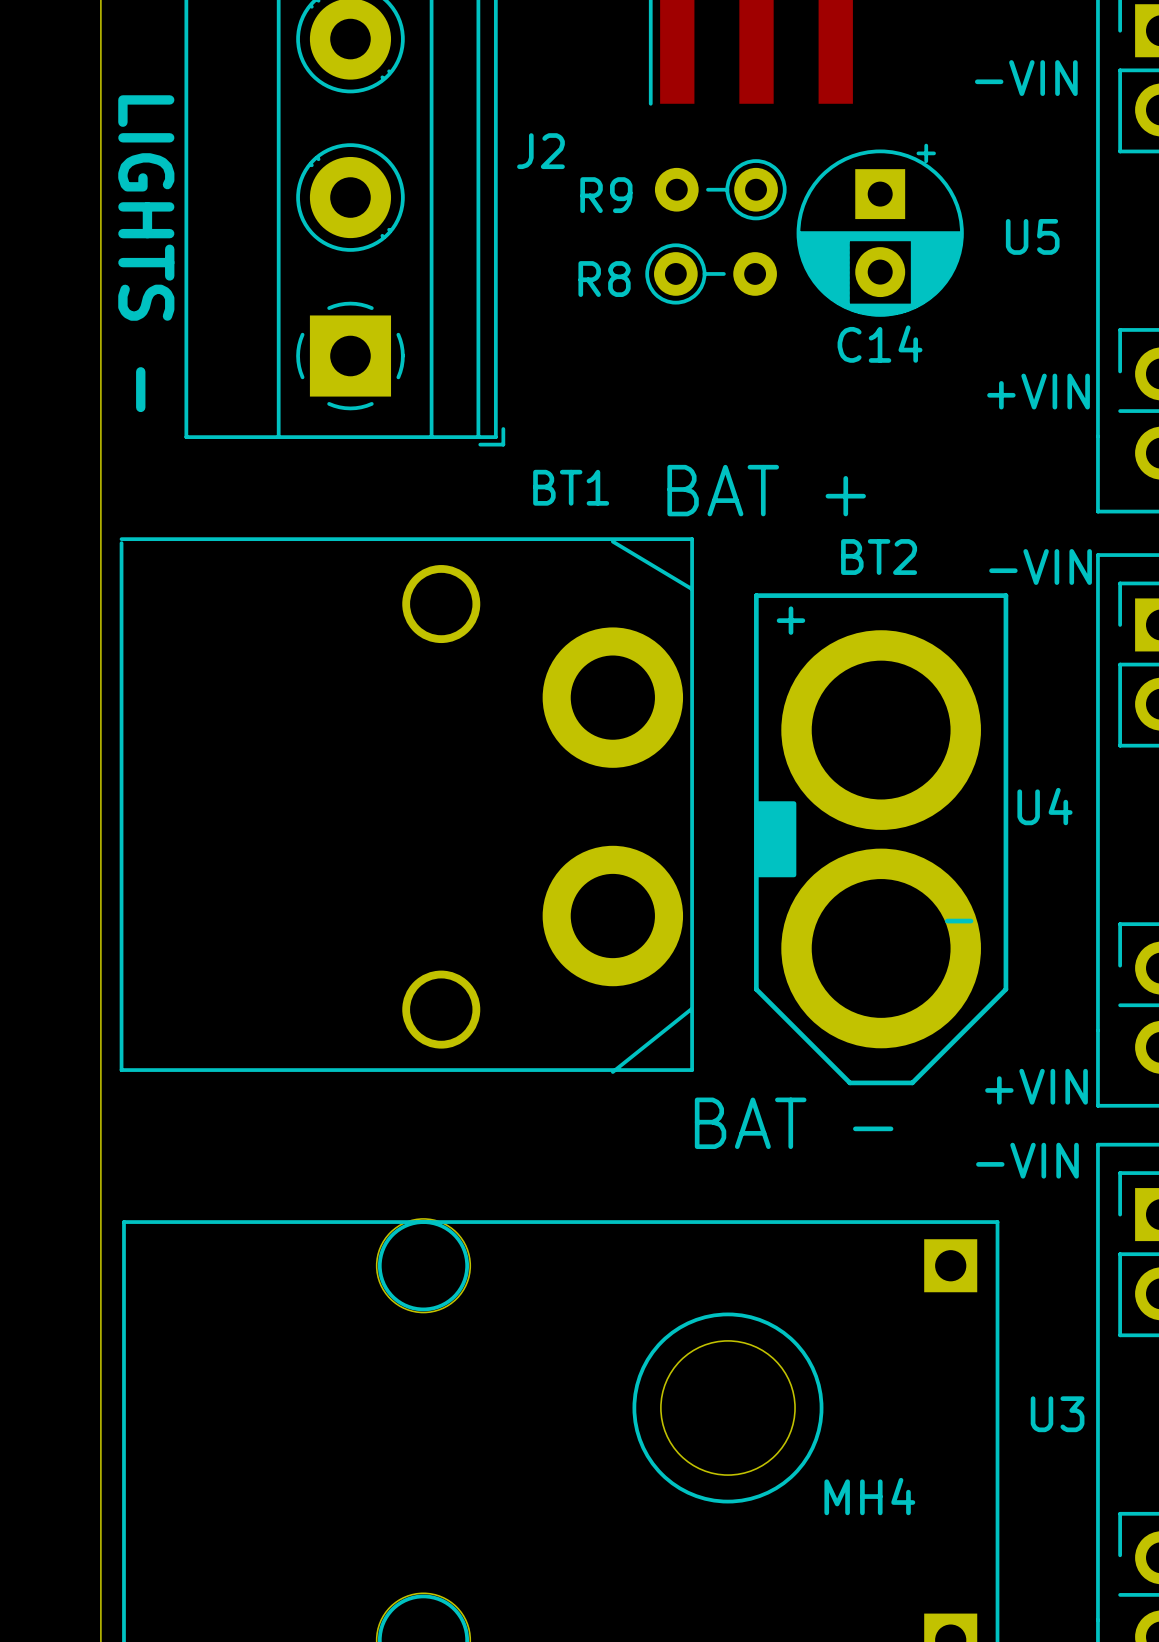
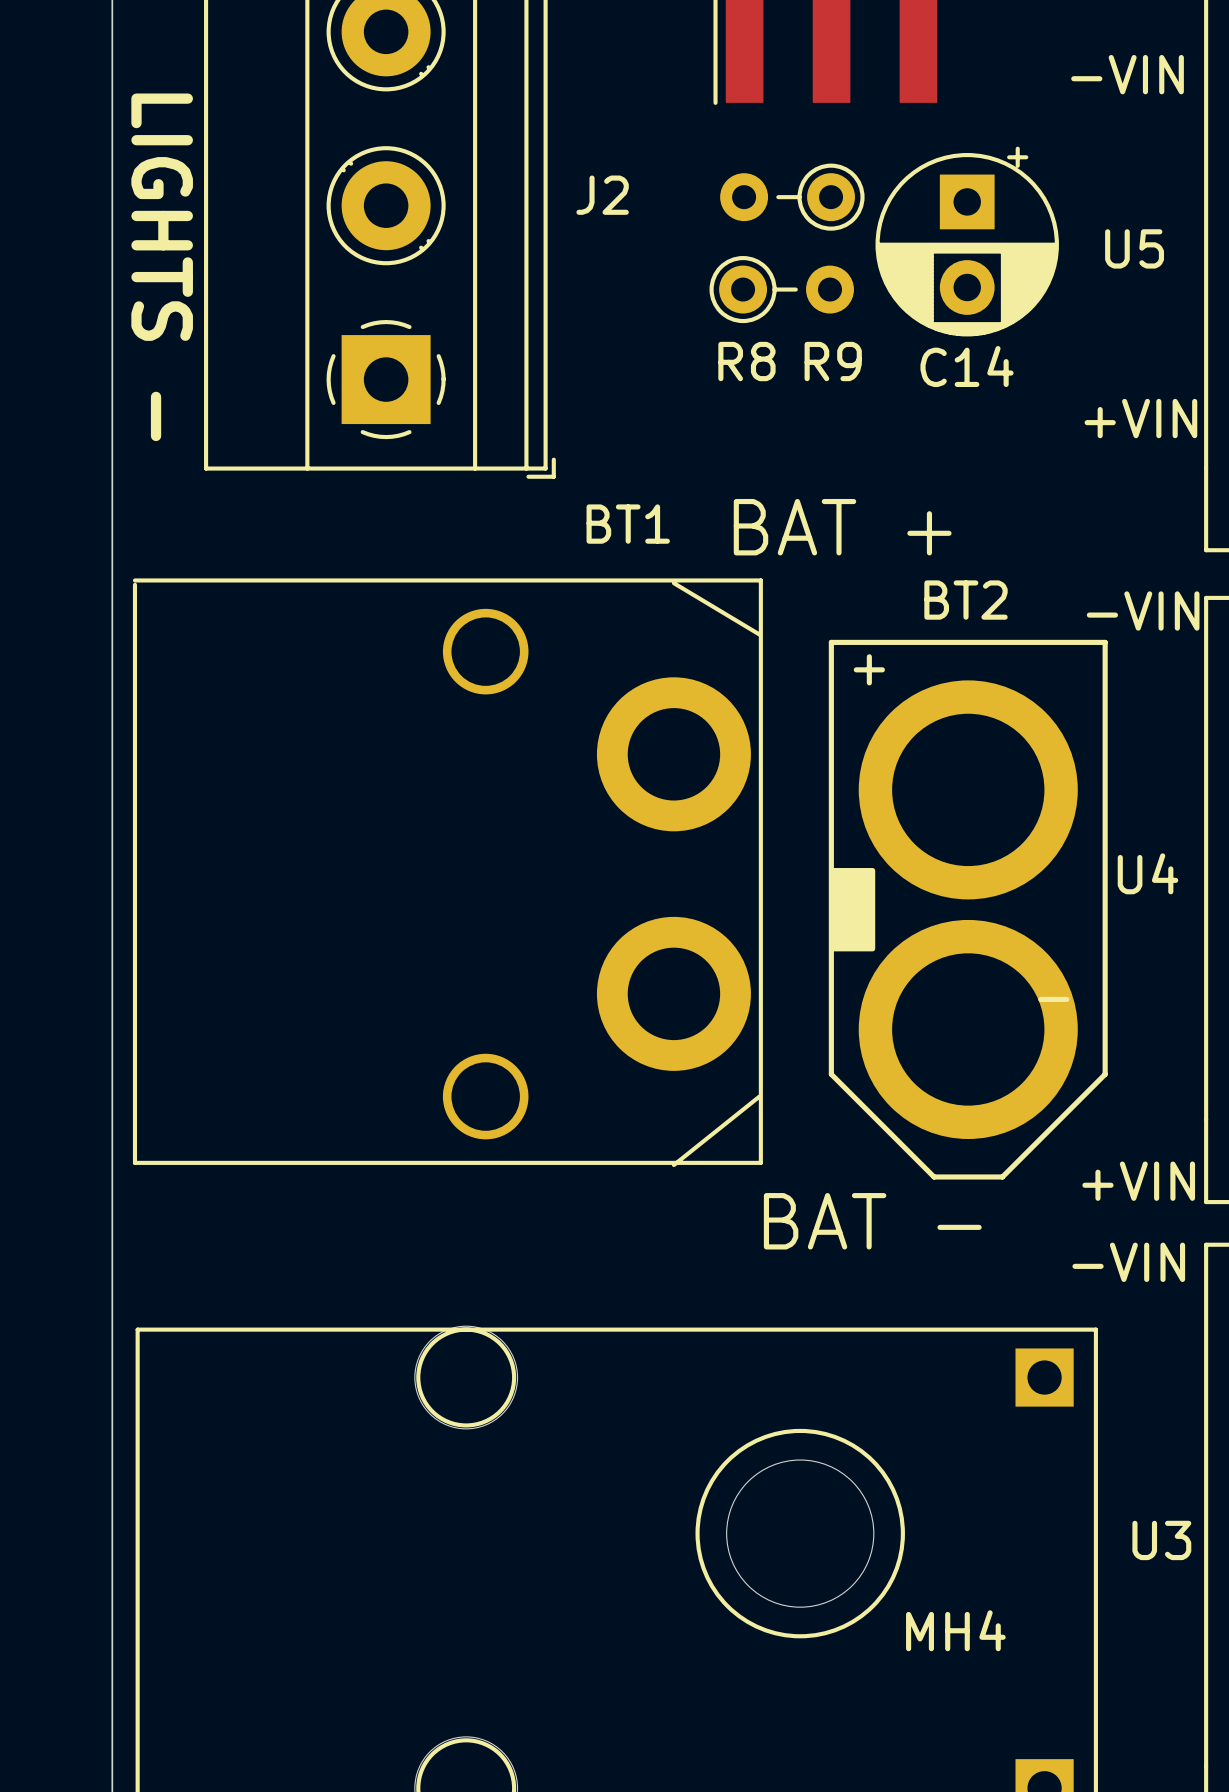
J2 name position: J2 (540, 151) -> J2 (602, 195)
R9 name position: R9 (606, 195) -> R9 (833, 361)
R8 name position: R8 (604, 279) -> R8 (746, 361)

